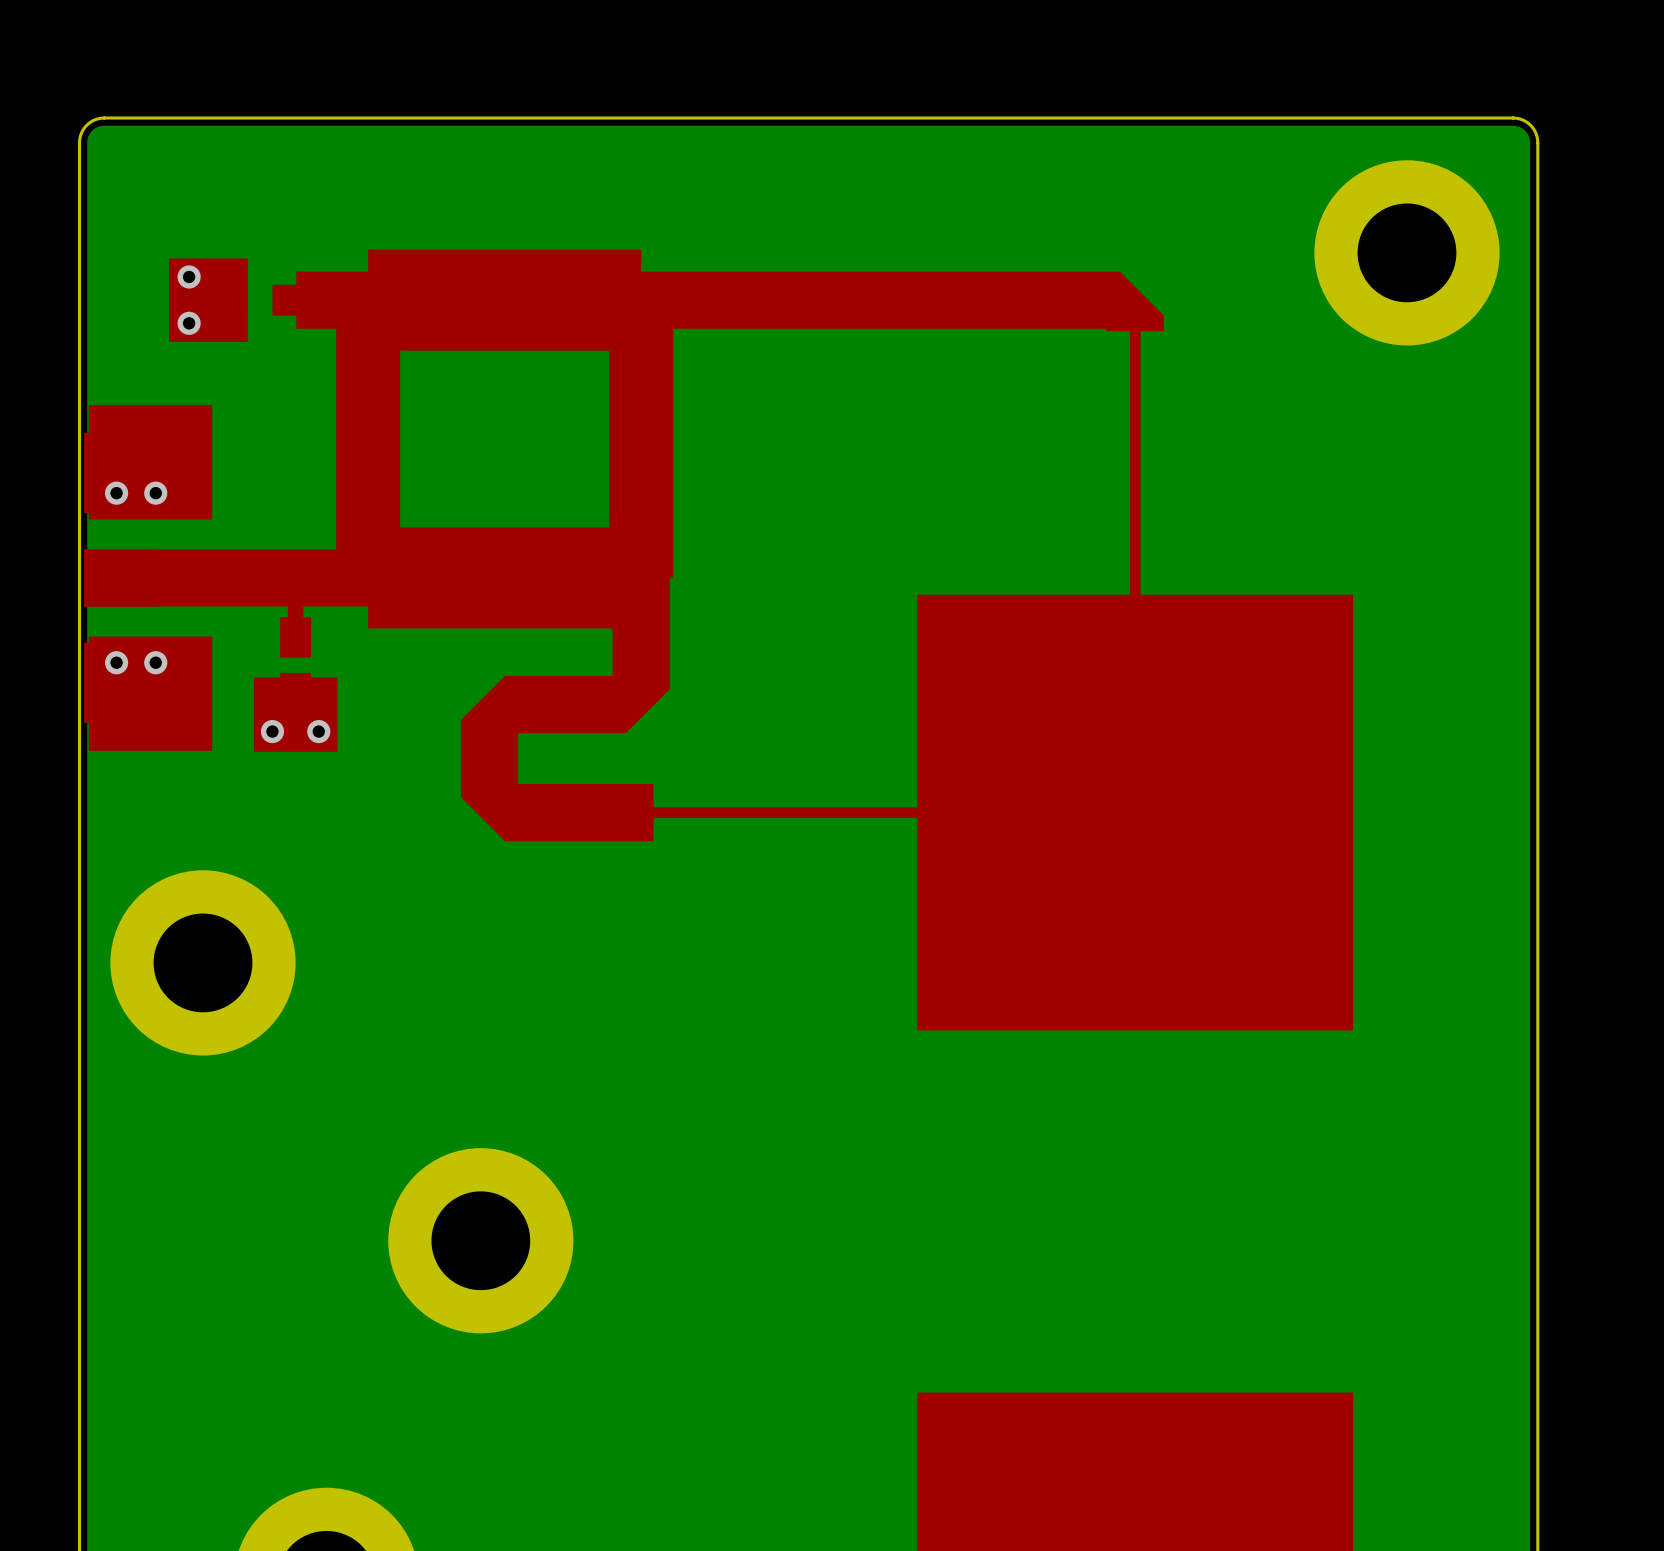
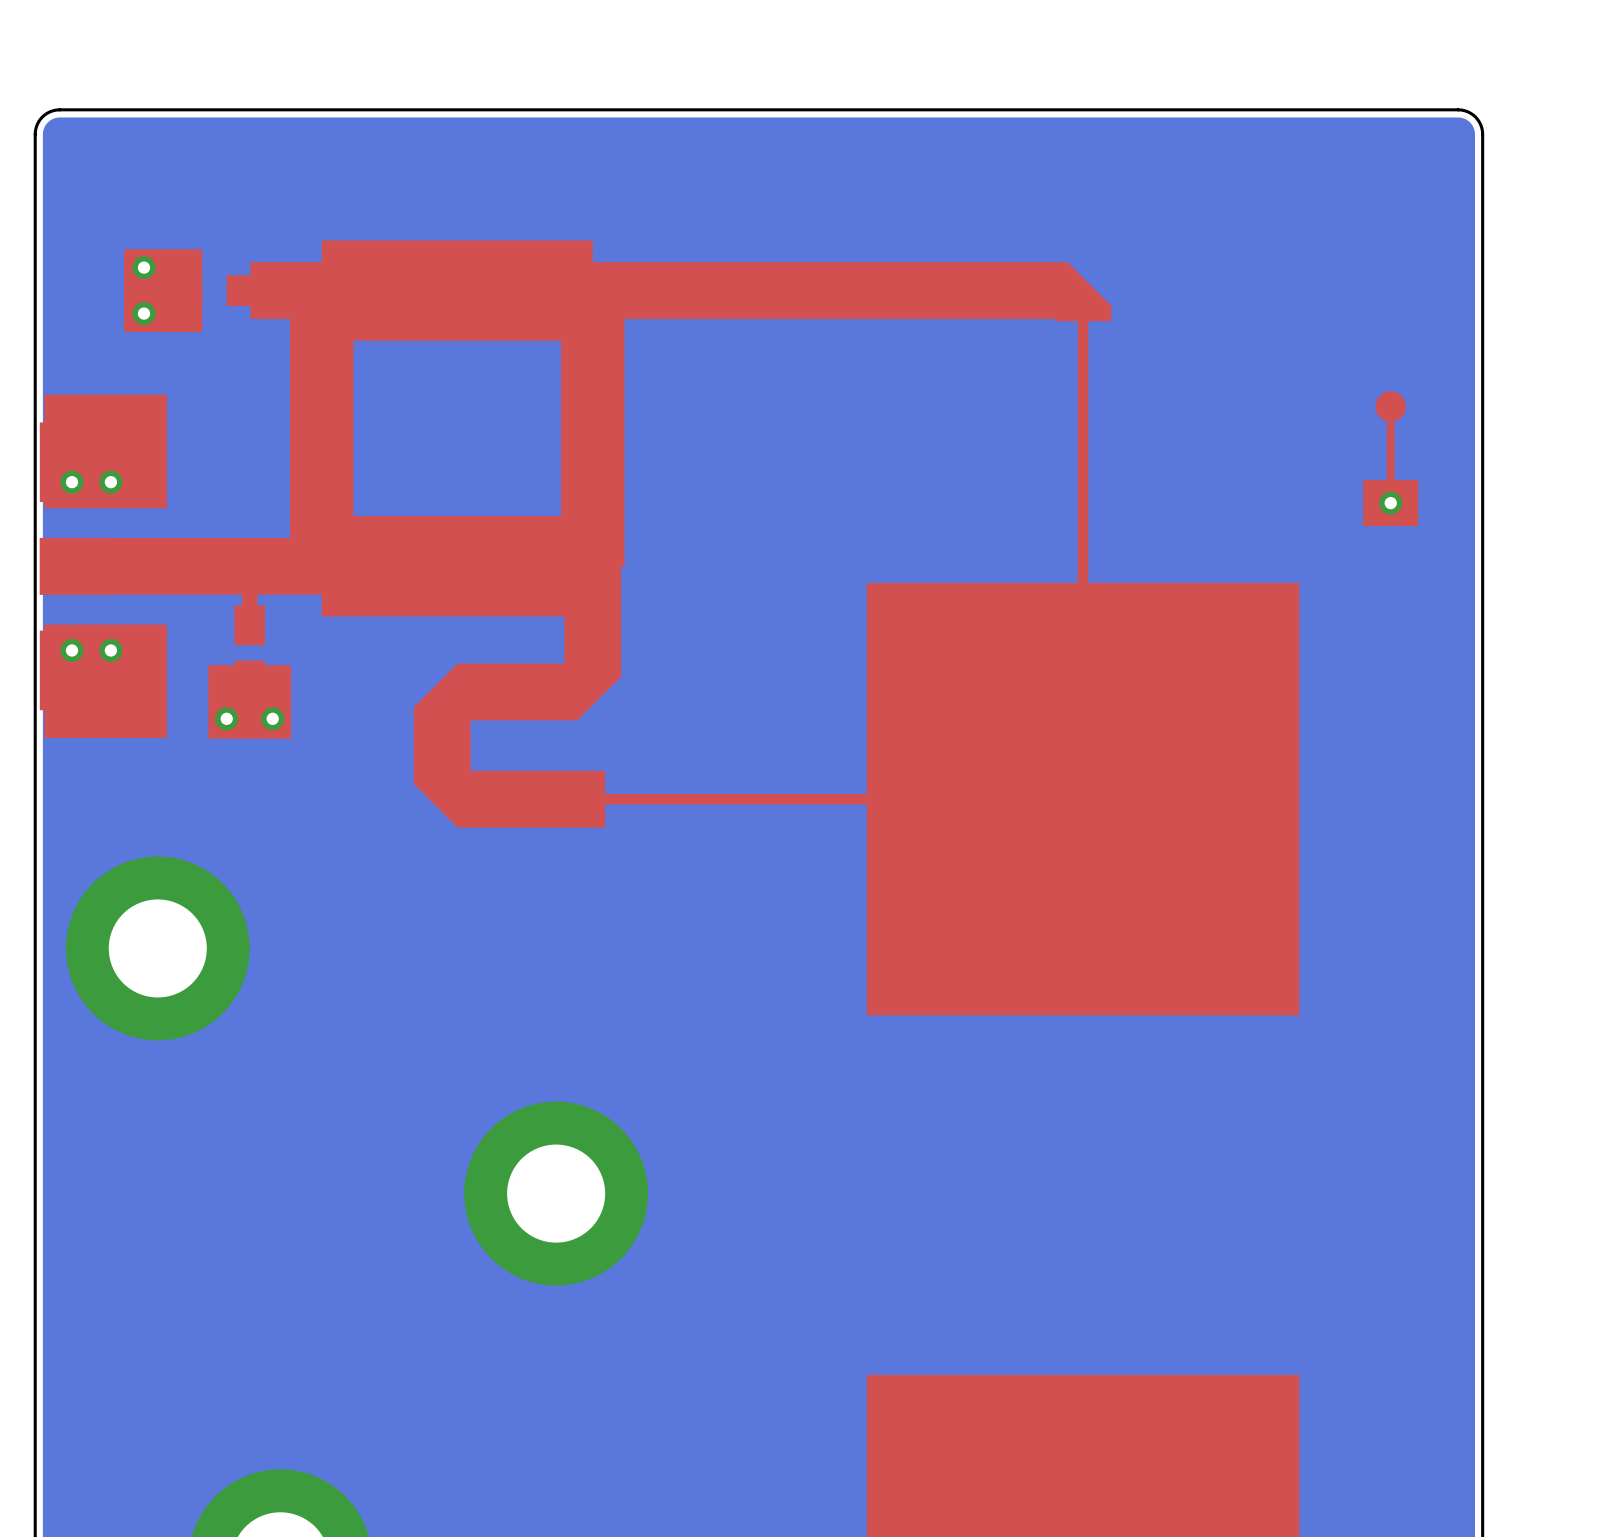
part: (1406, 252) -> none
drawing: none -> [1363, 391, 1419, 527]
via: none -> (1390, 503)
part position: (480, 1240) -> (556, 1193)

